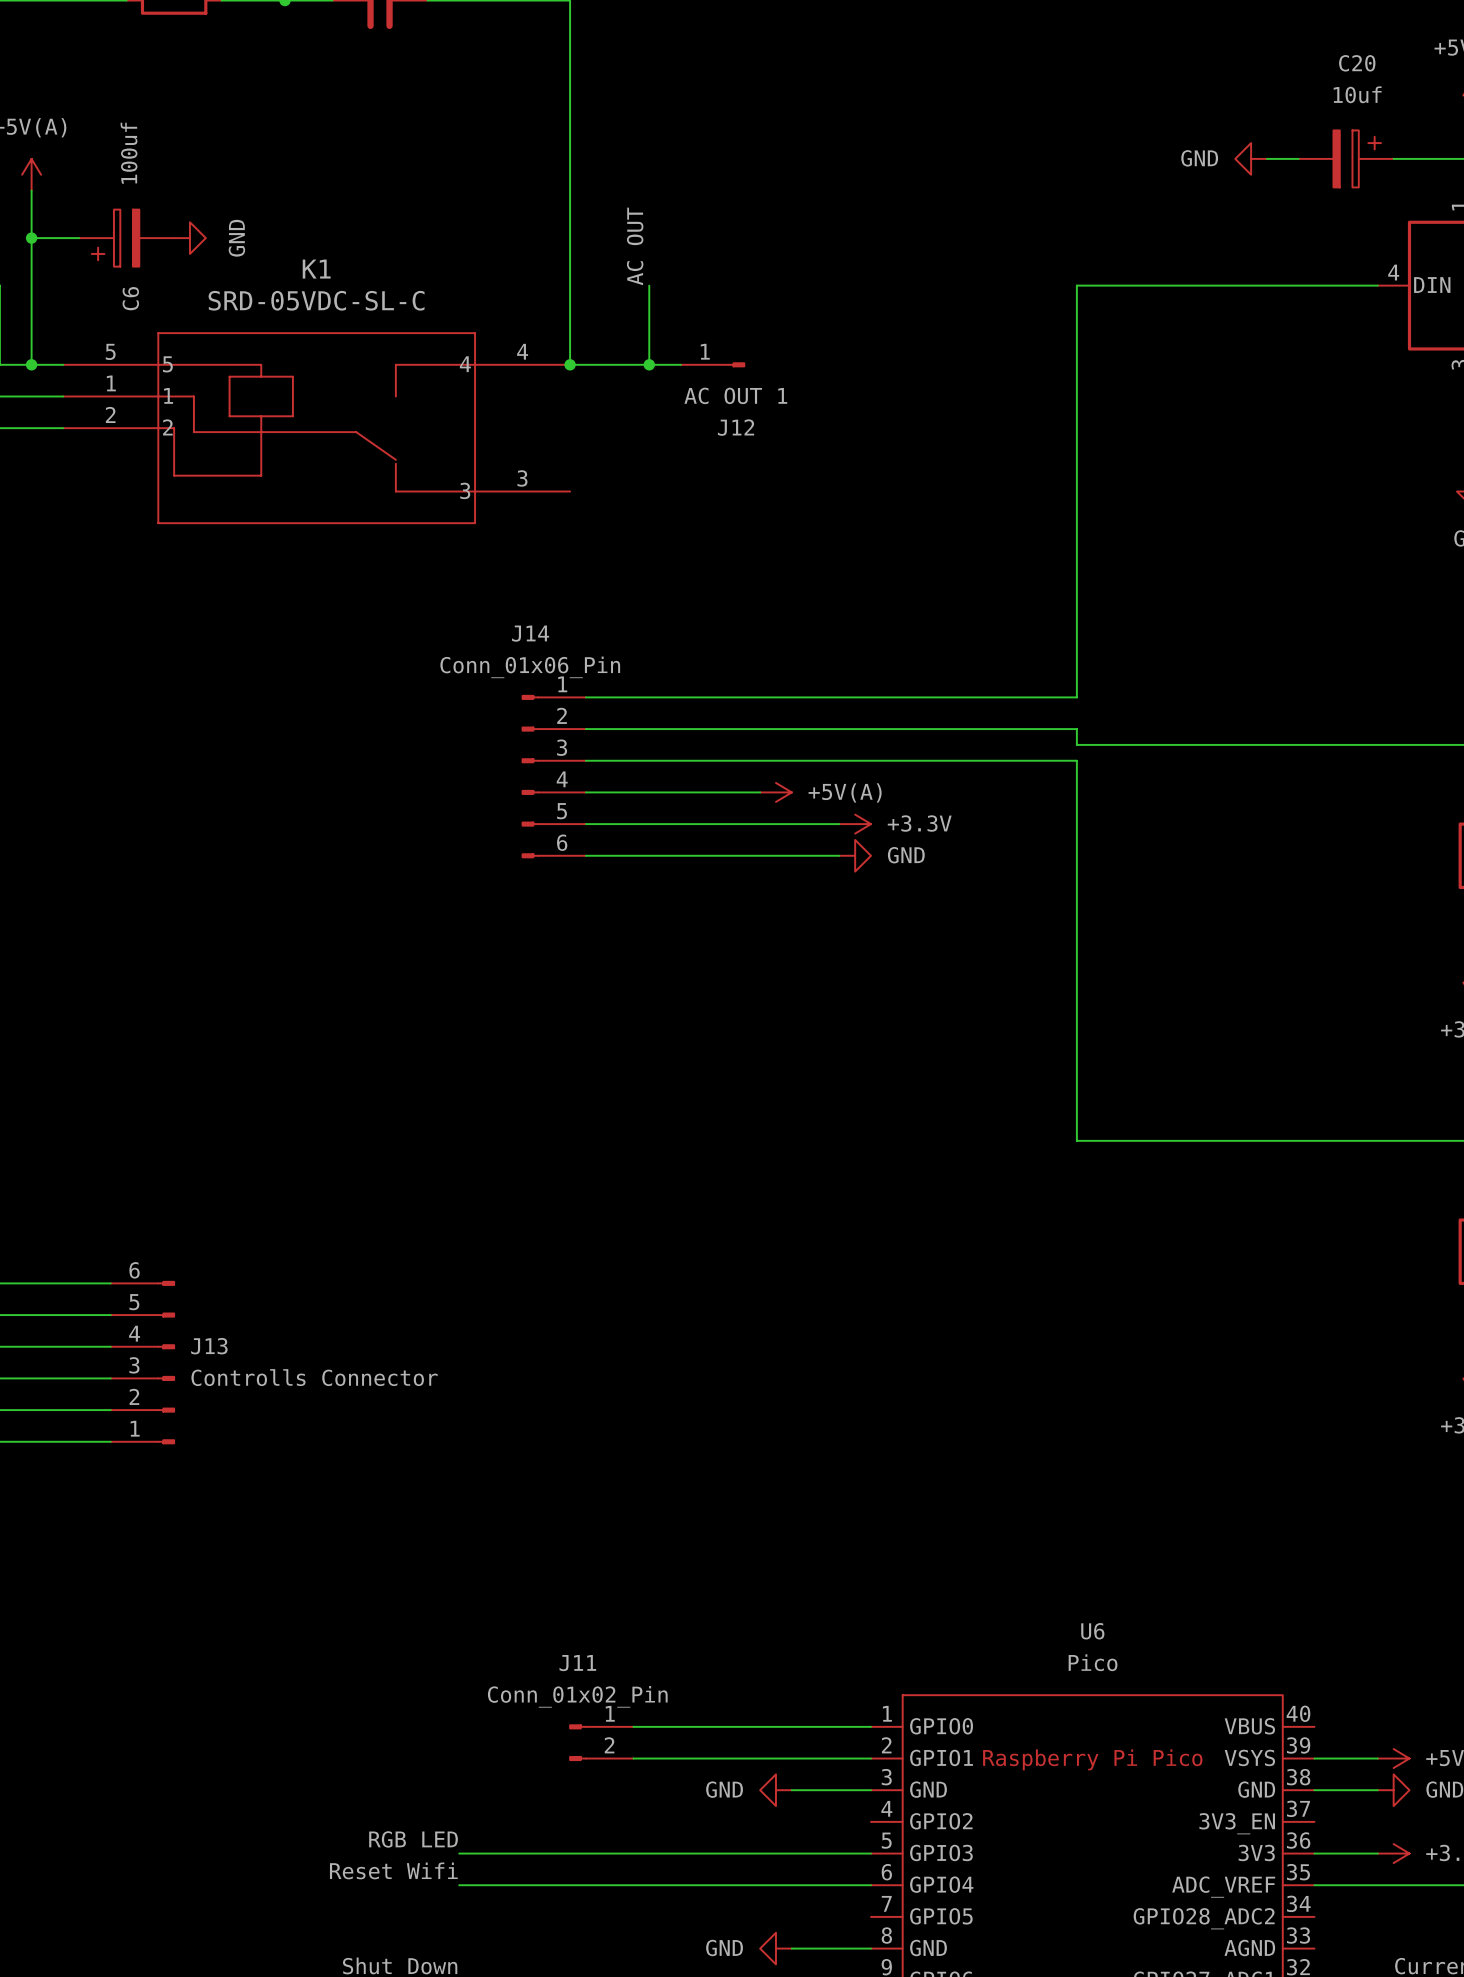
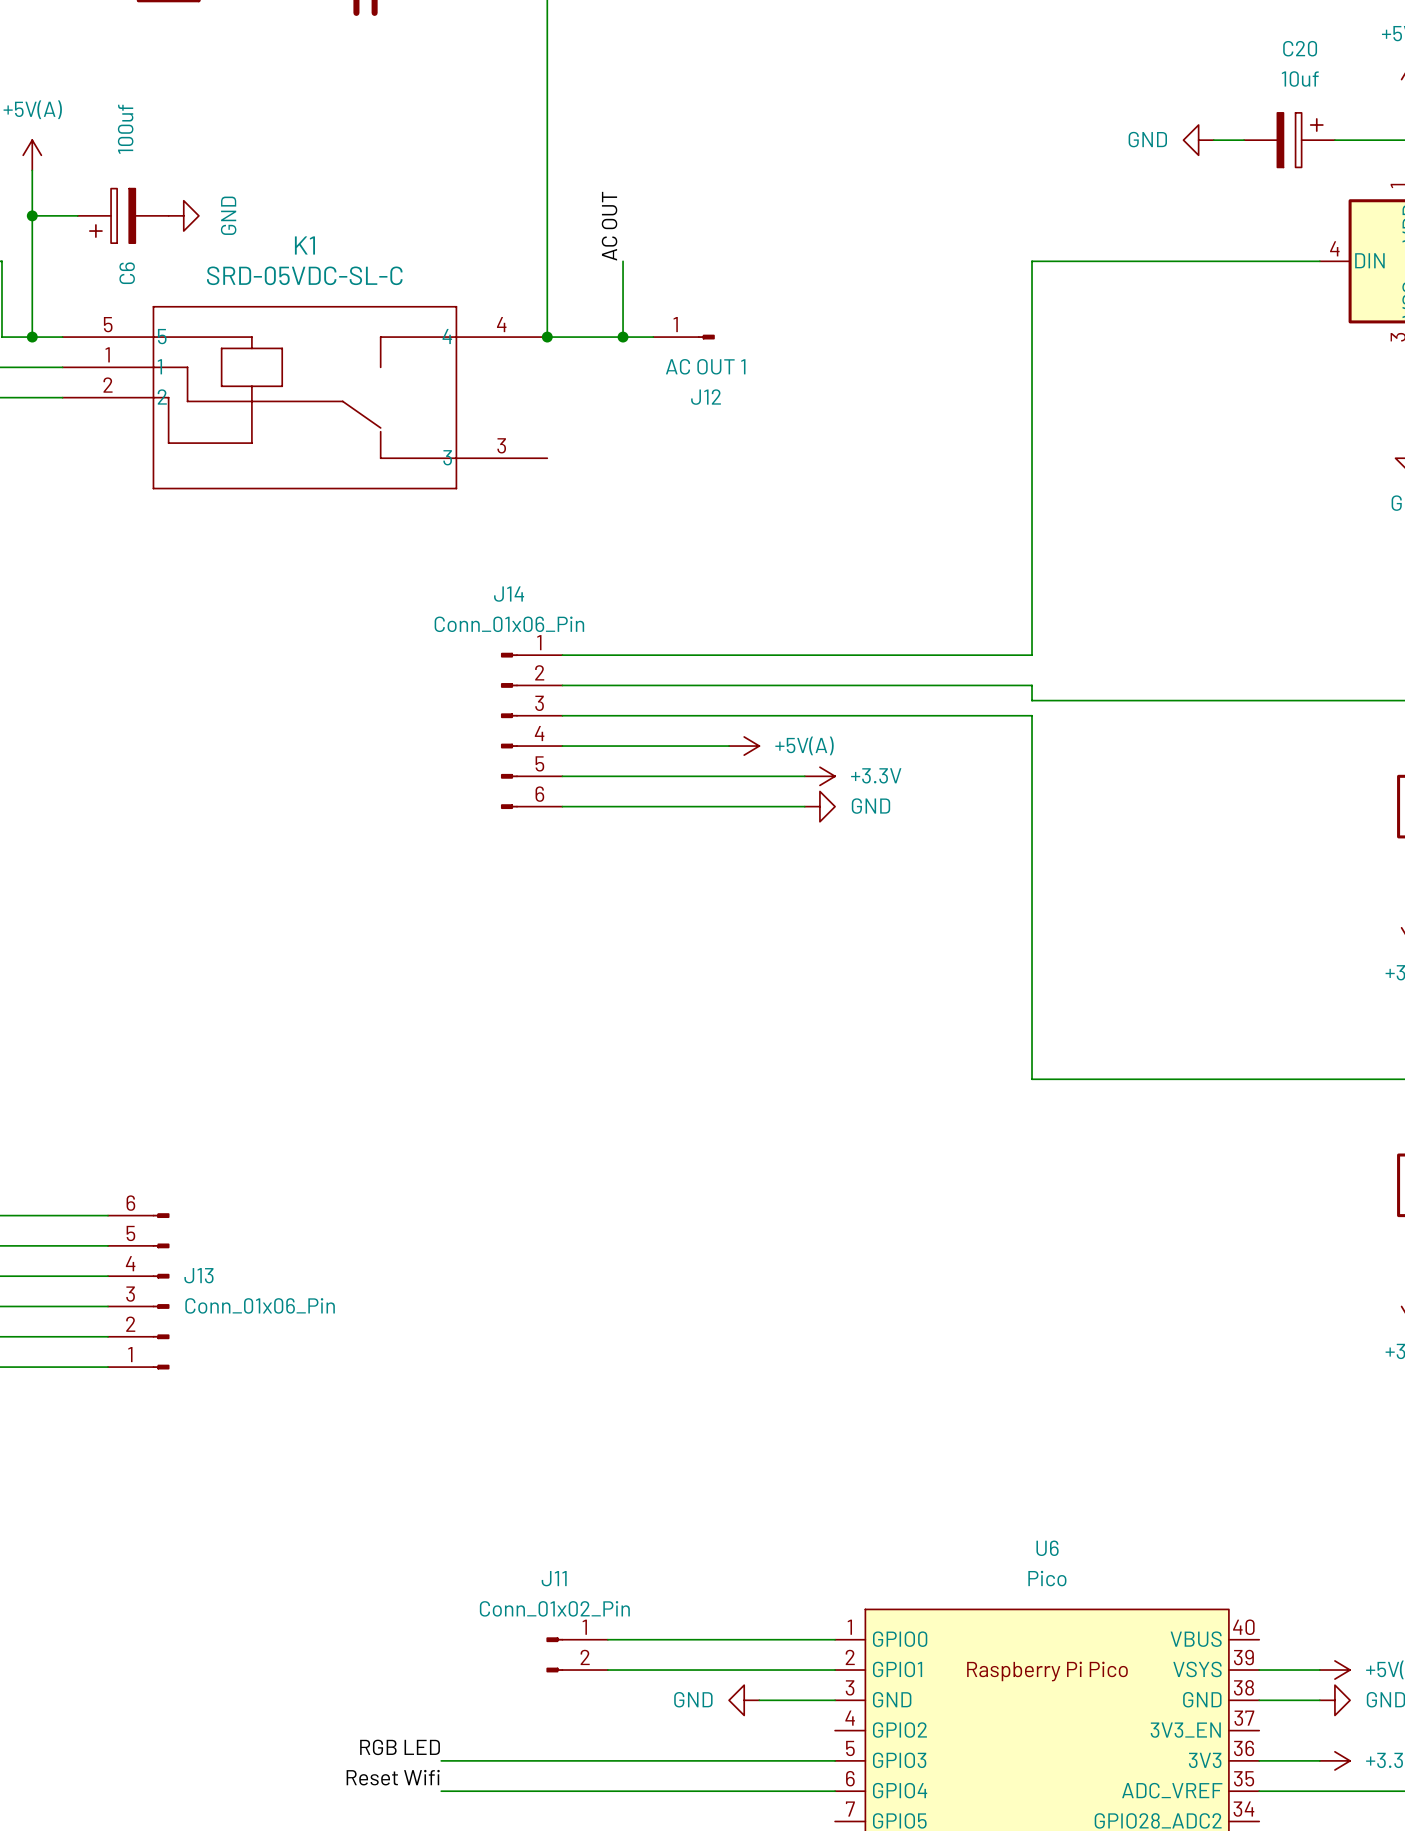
J13 value: Controlls Connector (314, 1377) -> Conn_01x06_Pin (260, 1305)

